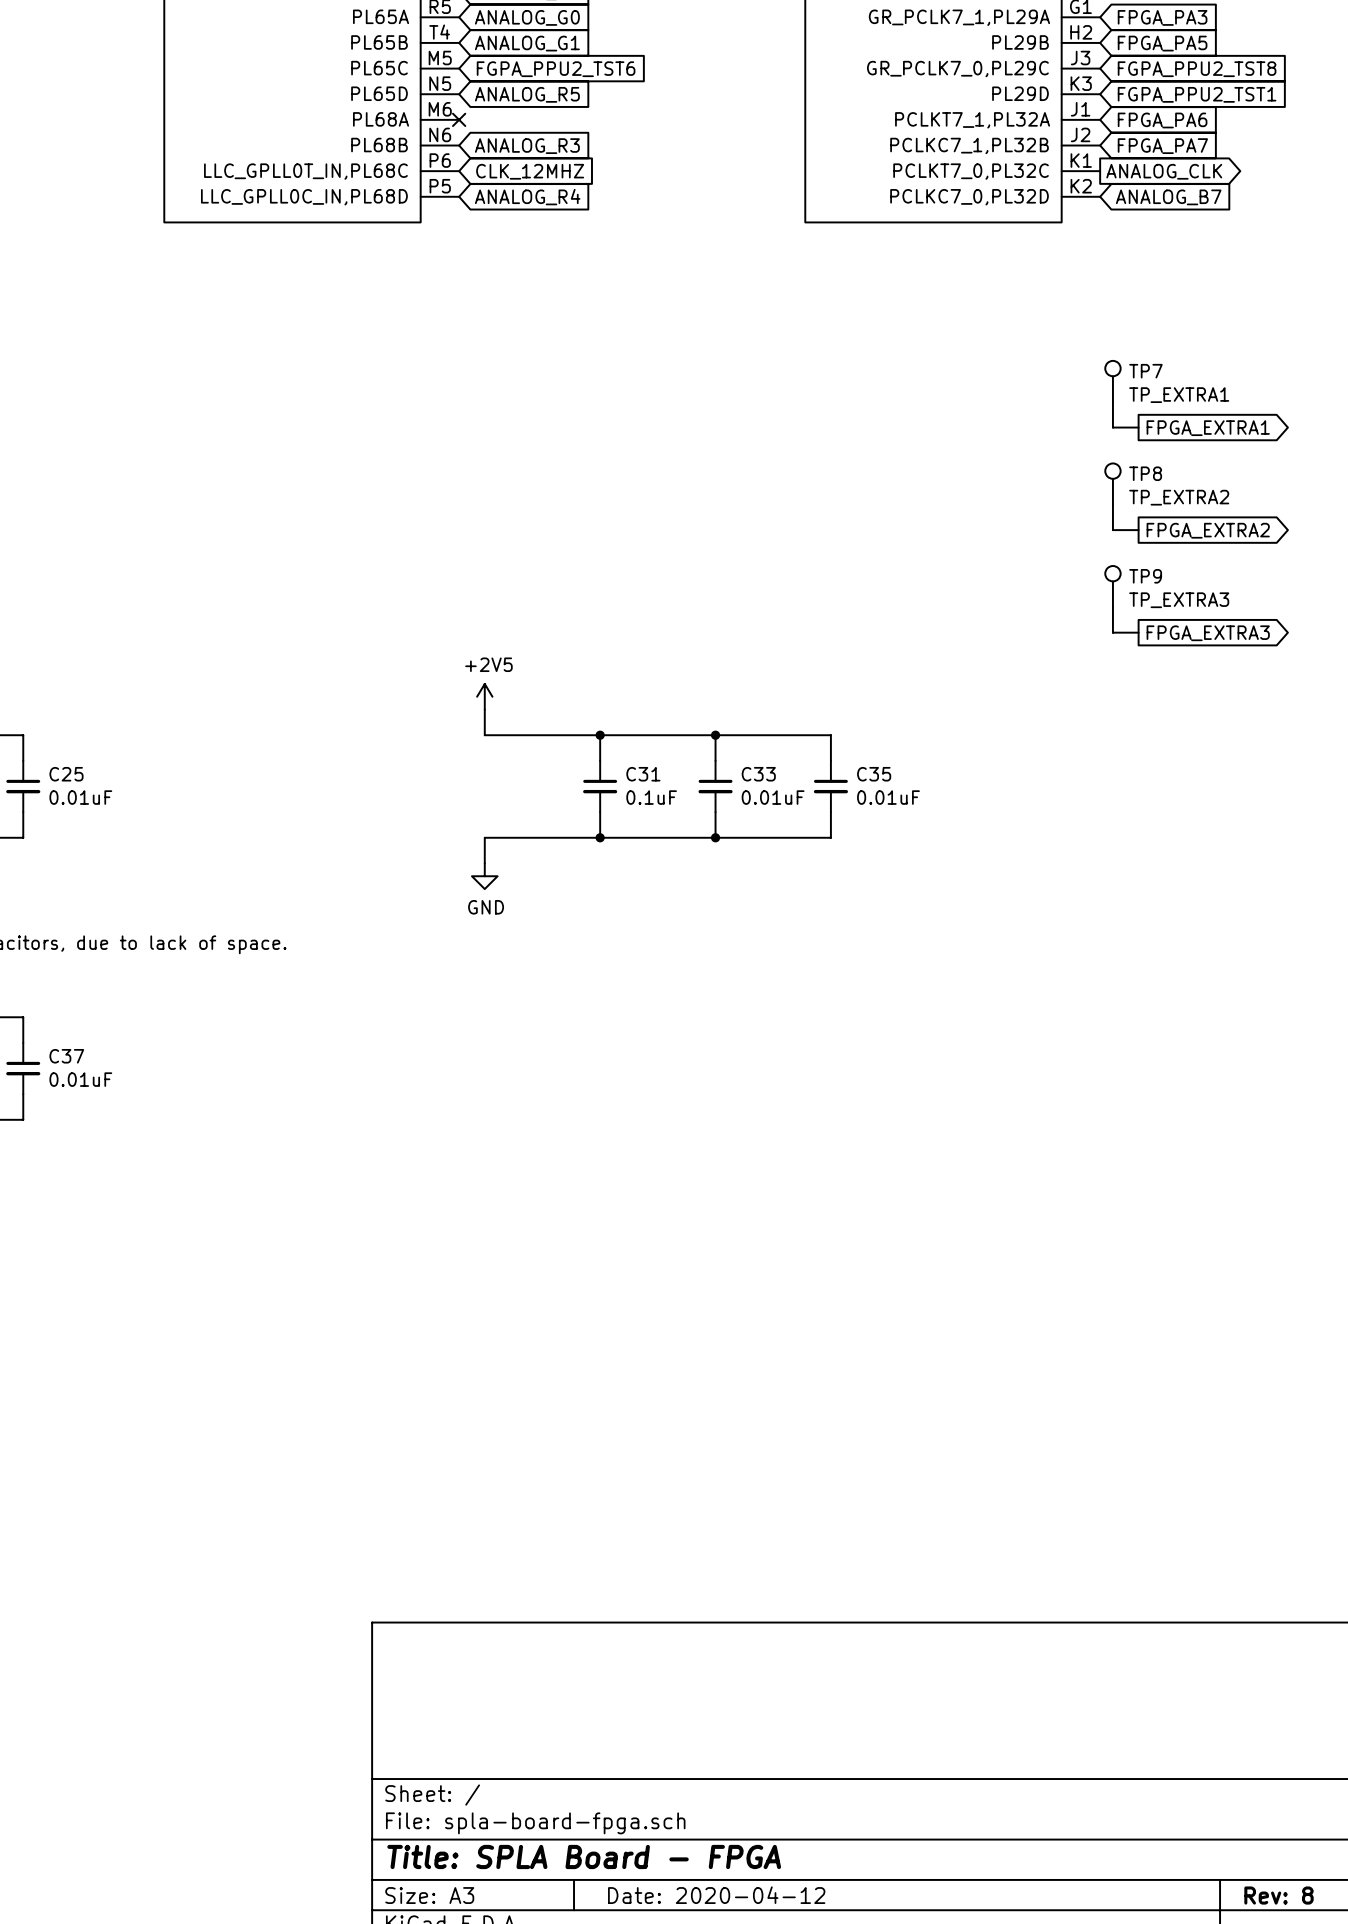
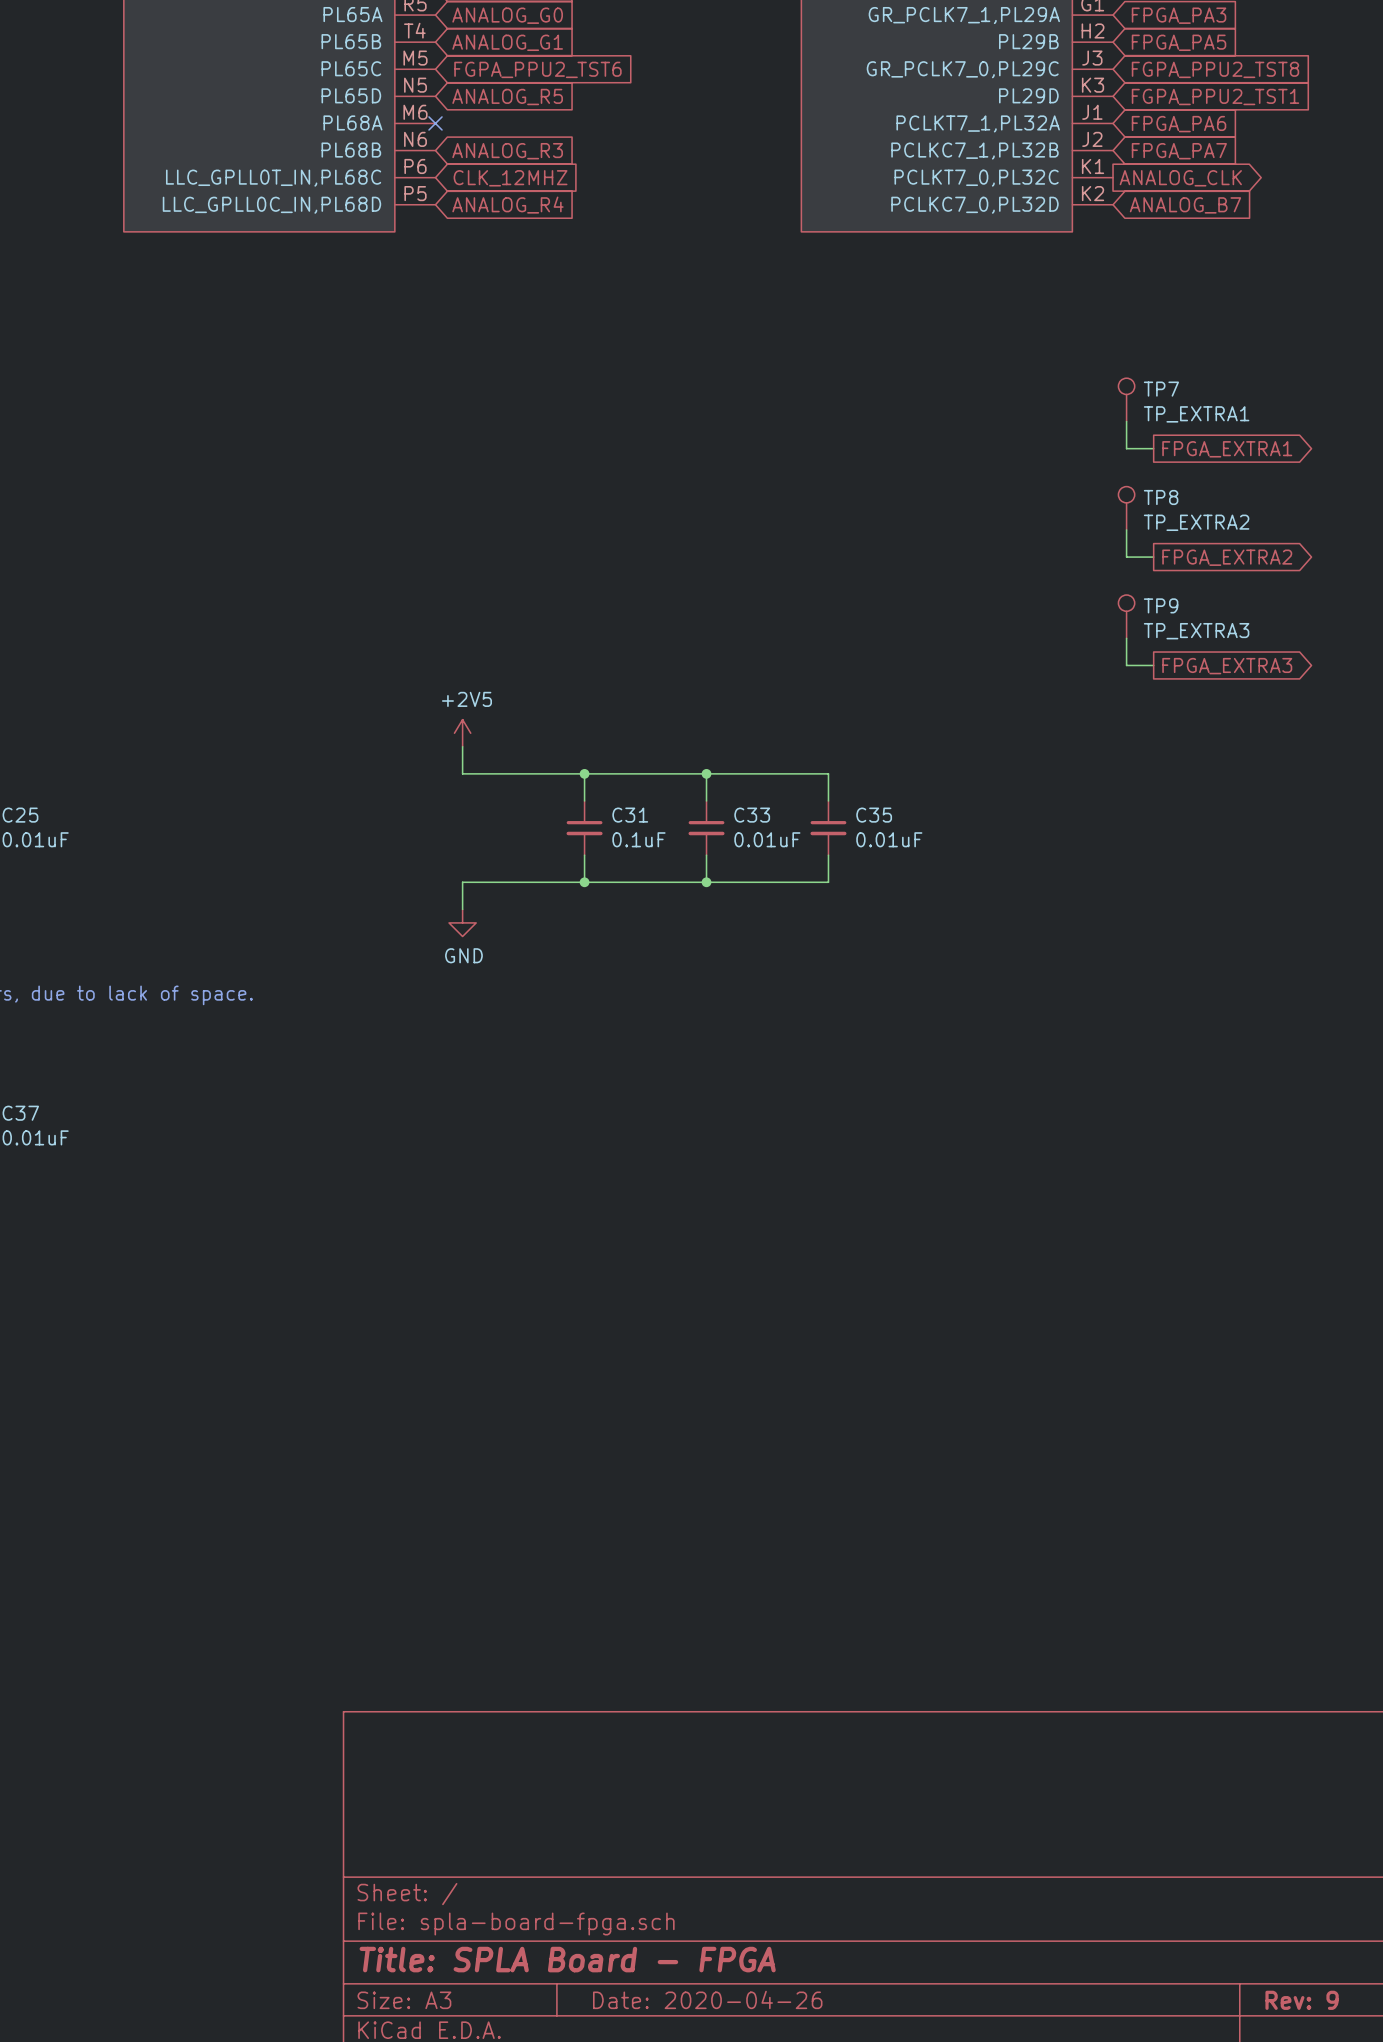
title block: Date: 2020-04-12 (716, 1895) -> Date: 2020-04-26 (707, 1999)
title block: Rev: 8 (1279, 1895) -> Rev: 9 (1302, 2000)

